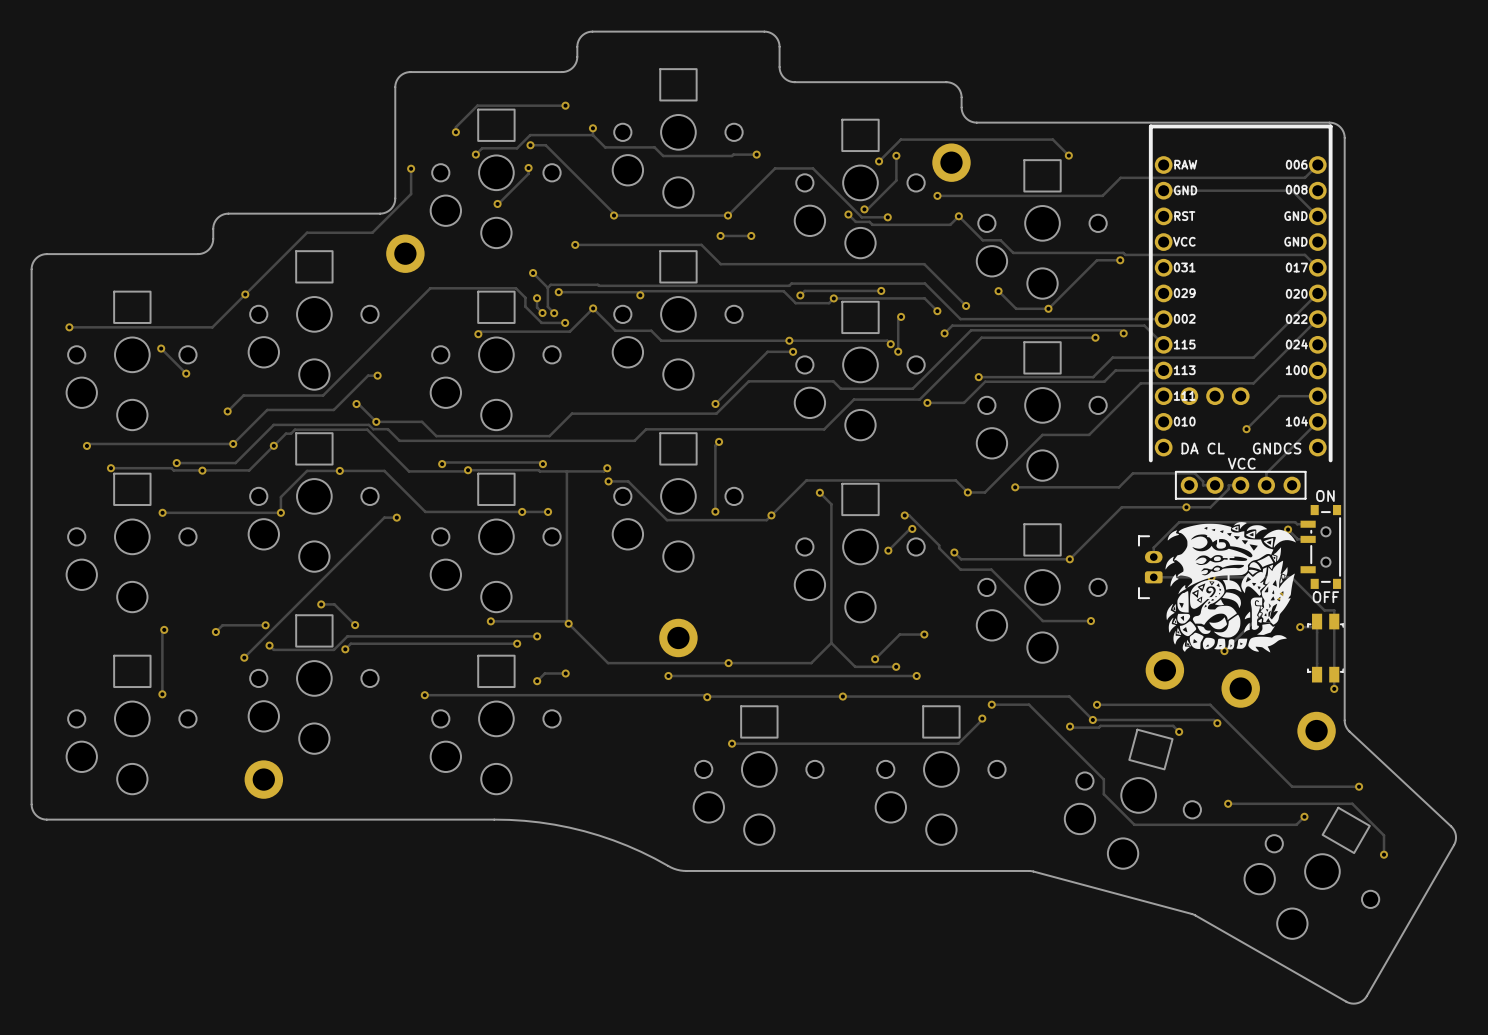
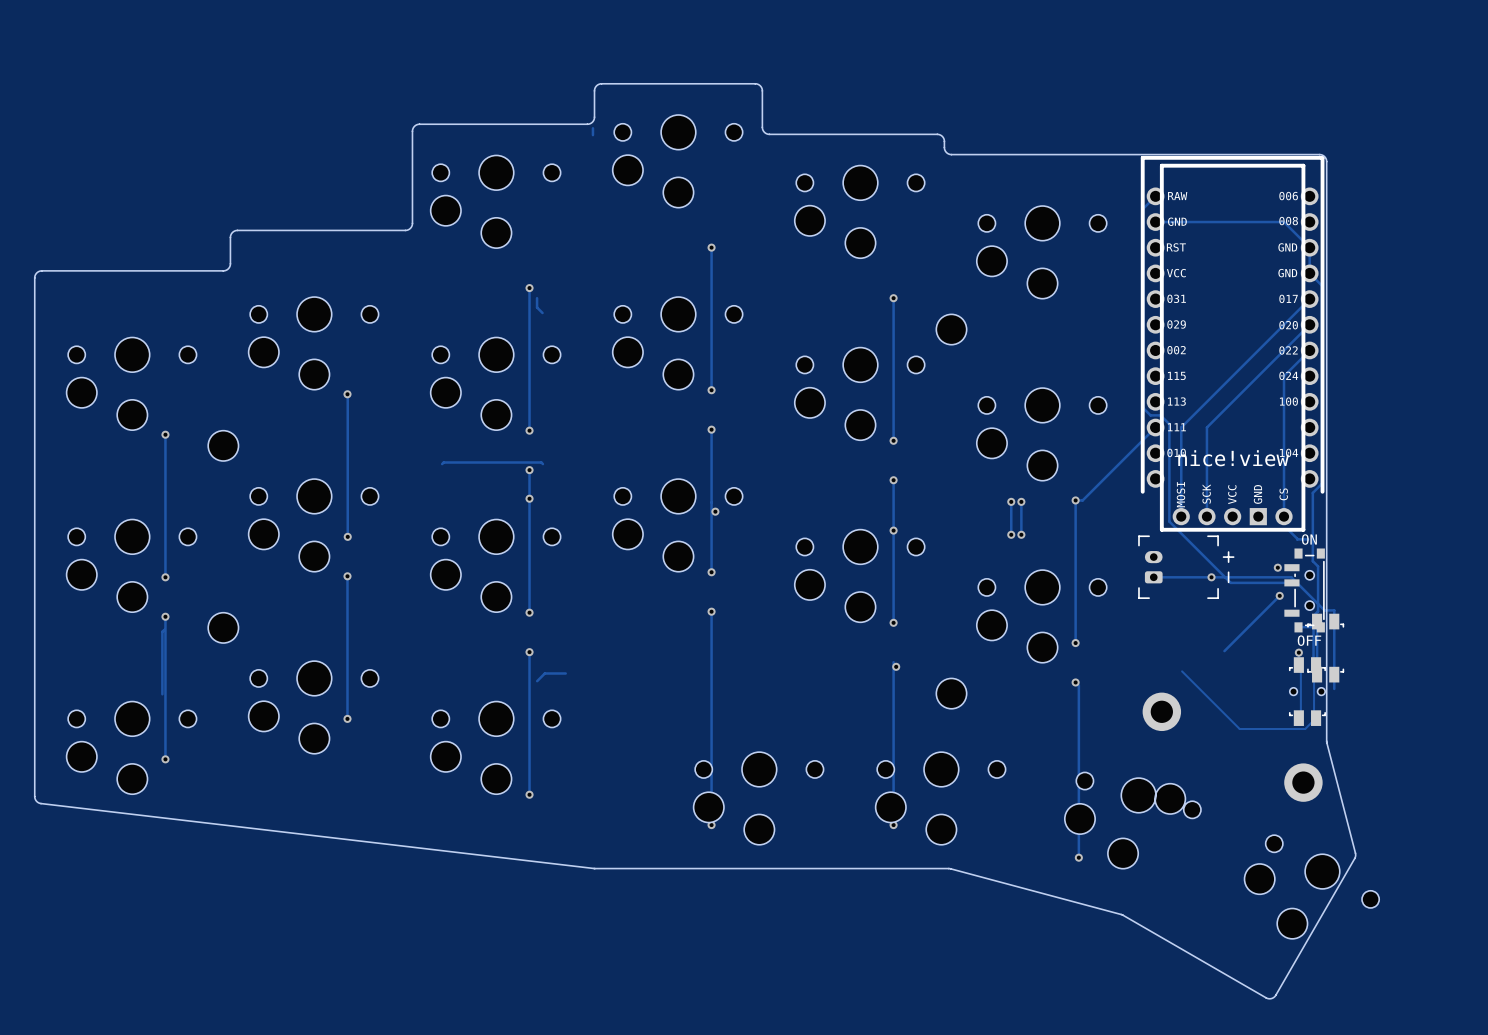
board edge: (592, 31) (768, 32) (775, 36) (778, 40) (780, 70) (782, 76) (788, 81) (950, 82) (955, 85) (960, 91) (963, 115) (967, 119) (974, 122) (1329, 122) (1337, 124) (1341, 128) (1344, 137) (1345, 723) (1349, 731) (1451, 826) (1456, 837) (1454, 845) (1362, 1000) (1353, 1003) (1346, 1001) (1193, 914) (1031, 871) (683, 870) (673, 868) (641, 851) (598, 835) (554, 824) (509, 819) (46, 819) (40, 818) (34, 813) (31, 804) (31, 269) (34, 260) (40, 255) (46, 254) (202, 253) (207, 250) (212, 244) (215, 221) (220, 215) (226, 213) (385, 212) (392, 207) (395, 200) (395, 87) (397, 79) (401, 75) (410, 72) (566, 71) (571, 68) (576, 62) (579, 39) (584, 33) (592, 31) -> (601, 83) (594, 88) (594, 117) (589, 124) (419, 124) (415, 125) (412, 131) (412, 224) (407, 230) (236, 230) (230, 235) (230, 264) (224, 270) (41, 270) (36, 273) (34, 277) (36, 800) (41, 803) (594, 868) (949, 868) (1122, 914) (1266, 997) (1273, 997) (1355, 855) (1326, 741) (1326, 161) (1325, 157) (1319, 154) (950, 154) (945, 151) (943, 138) (938, 134) (767, 133) (762, 128) (762, 89) (756, 83) (601, 83)
part: (678, 84) -> none
track: (565, 105) (477, 105) (455, 127) (455, 132) -> none
via: (565, 105) -> none
part: (496, 125) -> none
via: (592, 128) -> none
via: (455, 132) -> none
part: (860, 135) -> none
track: (530, 145) (545, 145) (613, 215) (728, 215) (775, 168) (812, 168) (861, 217) (887, 217) -> none
via: (530, 145) -> none
track: (475, 154) (482, 148) (517, 148) (530, 135) (592, 135) (605, 147) (654, 147) (663, 156) (756, 154) -> none
via: (475, 154) -> none
via: (756, 154) -> none
track: (896, 155) (896, 180) (867, 209) (864, 209) -> none
via: (896, 155) -> none
track: (1068, 155) (1052, 139) (900, 139) (879, 161) -> none
via: (1068, 155) -> none
via: (879, 161) -> none
part: (951, 162) -> none
track: (1317, 165) (1304, 177) (1120, 177) (1102, 195) (937, 195) -> none
track: (411, 168) (411, 194) (372, 232) (307, 232) (212, 327) (69, 327) -> none
via: (411, 168) -> none
track: (528, 168) (528, 173) (497, 203) -> none
via: (528, 168) -> none
part: (1042, 175) -> none
track: (1163, 190) (1292, 190) (1317, 216) -> none
via: (937, 195) -> none
track: none -> (1155, 196) (1143, 208) (1143, 408) (1150, 415) (1160, 415) (1169, 424) (1169, 521) (1230, 582) (1291, 582)
via: (497, 203) -> none
via: (864, 209) -> none
track: (848, 214) (855, 221) (869, 221) (872, 224) (950, 224) (958, 216) (982, 240) (1000, 240) (1013, 252) (1304, 254) (1317, 267) -> none
via: (848, 214) -> none
via: (613, 215) -> none
via: (728, 215) -> none
via: (958, 216) -> none
via: (887, 217) -> none
track: none -> (1155, 222) (1284, 222) (1309, 247) (1309, 273) (1321, 285) (1321, 483) (1312, 492) (1312, 561) (1318, 566) (1318, 611) (1313, 615) (1313, 662) (1316, 665) (1314, 667) (1314, 716) (1316, 718) (1305, 729) (1239, 729) (1182, 671)
track: (720, 235) (751, 235) -> none
via position: (720, 235) -> (711, 247)
via: (751, 235) -> none
track: (575, 244) (701, 244) (720, 264) (924, 264) (966, 305) -> none
via: (575, 244) -> none
track: none -> (711, 247) (711, 390)
part: (405, 253) -> none
track: (1120, 260) (1097, 260) (1048, 308) (1016, 308) (998, 291) -> none
via: (1120, 260) -> none
part: (314, 266) -> none
part: (678, 266) -> none
track: (533, 273) (547, 287) -> none
via: (533, 273) -> none
track: none -> (529, 288) (529, 430)
via: none -> (529, 288)
track: (881, 290) (804, 290) (800, 295) -> none
via: (881, 290) -> none
via: (998, 291) -> none
track: (558, 292) (640, 292) -> none
via: (558, 292) -> none
track: (640, 292) (783, 291) (795, 303) (829, 303) (833, 298) (924, 298) (937, 311) -> none
part: (1240, 293) -> none
track: (1317, 293) (1253, 357) (1112, 357) (1093, 377) (978, 377) -> none
via: (245, 294) -> none
via: (640, 295) -> none
via: (800, 295) -> none
via: (537, 298) -> none
via: (833, 298) -> none
track: none -> (893, 298) (893, 440)
via: none -> (893, 298)
track: none -> (1309, 299) (1181, 427) (1181, 516)
via: (966, 305) -> none
part: (132, 307) -> none
part: (496, 307) -> none
via: (593, 308) -> none
via: (1048, 308) -> none
via: (937, 311) -> none
via: (542, 312) -> none
track: (554, 313) (547, 306) (547, 287) (550, 284) (789, 285) (791, 283) (924, 283) (960, 319) (1163, 319) -> none
via: (554, 313) -> none
track: (901, 316) (898, 319) (898, 351) -> none
via: (901, 316) -> none
part: (860, 317) -> none
track: (1317, 319) (1253, 383) (1140, 383) (1089, 434) (1042, 434) (984, 492) (967, 492) (955, 480) (806, 480) (766, 520) (667, 520) (628, 481) (608, 481) -> none
track: (565, 322) (541, 322) (525, 306) (525, 297) (515, 288) (430, 288) (323, 395) (243, 395) (227, 411) -> none
via: (565, 322) -> none
part: none -> (1232, 324)
track: none -> (1309, 324) (1206, 427) (1206, 516)
via: (69, 327) -> none
part: none -> (951, 329)
track: (944, 333) (952, 325) (1144, 325) (1163, 344) -> none
via: (944, 333) -> none
track: (1123, 333) (1120, 330) (971, 330) (912, 388) (840, 388) (833, 381) (748, 381) (716, 413) (572, 413) (549, 436) (436, 436) (422, 421) (376, 421) (356, 404) -> none
via: (1123, 333) -> none
track: (478, 334) (480, 331) (569, 331) (593, 308) (615, 330) (651, 330) (661, 340) (887, 340) (890, 344) -> none
via: (478, 334) -> none
track: (1095, 337) (981, 337) (919, 399) (854, 399) (824, 429) (646, 429) (634, 440) (399, 440) (387, 429) (373, 429) (368, 424) (273, 424) (235, 463) (176, 463) -> none
via: (1095, 337) -> none
via: (789, 340) -> none
via: (890, 344) -> none
part: none -> (1232, 347)
track: (161, 348) (186, 373) -> none
via: (161, 348) -> none
track: none -> (1309, 350) (1284, 376) (1284, 516)
track: (793, 351) (767, 351) (715, 403) -> none
via: (793, 351) -> none
via: (898, 351) -> none
part: (1042, 357) -> none
track: (1163, 370) (1115, 370) (1104, 381) (985, 381) (964, 402) (927, 402) -> none
via: (186, 373) -> none
track: (377, 375) (368, 375) (333, 409) (267, 409) (233, 443) (88, 443) (86, 445) -> none
via: (377, 375) -> none
via: (978, 377) -> none
via: none -> (711, 390)
track: none -> (347, 394) (347, 536)
track: (1317, 396) (1279, 396) (1246, 429) -> none
via: (927, 402) -> none
via: (715, 403) -> none
via position: (356, 404) -> (347, 394)
via: (227, 411) -> none
via: (376, 421) -> none
track: (1317, 421) (1266, 473) (1266, 485) -> none
track: none -> (1155, 427) (1082, 500) (1075, 500) (1075, 643)
track: none -> (711, 429) (711, 572)
via: none -> (711, 429)
via: (1246, 429) -> none
via: none -> (529, 430)
track: none -> (165, 434) (165, 577)
via: none -> (165, 434)
via: none -> (893, 440)
track: (719, 441) (715, 445) (715, 511) -> none
via: (719, 441) -> none
via: (233, 443) -> none
via: (86, 445) -> none
part: none -> (223, 445)
via: (273, 445) -> none
part: (314, 448) -> none
part: (678, 448) -> none
via: (176, 463) -> none
via: (442, 464) -> none
via position: (542, 464) -> (529, 470)
track: (110, 468) (249, 470) (285, 433) (291, 433) (294, 429) (367, 429) (409, 471) (604, 471) (607, 468) -> none
via: (110, 468) -> none
via: (607, 468) -> none
via: (202, 470) -> none
via: (339, 470) -> none
via: (468, 470) -> none
track: none -> (529, 470) (529, 612)
track: (566, 471) (566, 621) -> none
track: none -> (893, 480) (893, 622)
via: none -> (893, 480)
via: (608, 481) -> none
track: (1215, 485) (1203, 485) (1203, 481) (1194, 473) (1132, 473) (1119, 487) (1015, 487) -> none
track: (1240, 485) (1228, 485) (1228, 489) (1210, 507) (1121, 507) (1069, 559) (961, 559) (954, 552) -> none
part: (1240, 485) -> none
via: (1015, 487) -> none
part: (132, 489) -> none
part: (496, 489) -> none
track: (819, 492) (831, 504) (831, 643) -> none
via: (819, 492) -> none
via: (967, 492) -> none
via: none -> (529, 498)
part: (860, 499) -> none
via: none -> (1075, 500)
track: none -> (1011, 501) (1011, 534)
via: none -> (1011, 501)
track: none -> (1021, 501) (1021, 534)
via: none -> (1021, 501)
via: (1186, 507) -> none
via: (522, 511) -> none
track: (548, 511) (425, 511) (384, 470) (307, 470) (280, 497) (280, 512) (162, 512) -> none
via: (548, 511) -> none
via: (162, 512) -> none
via: (280, 512) -> none
via: (771, 515) -> none
track: (904, 515) (909, 515) (960, 569) (991, 569) (1042, 621) (1090, 621) -> none
via: (904, 515) -> none
track: (396, 517) (384, 517) (244, 657) -> none
via: (396, 517) -> none
drawing: [1165, 522, 1296, 653] -> none
track: (1308, 524) (1297, 524) (1295, 522) (1179, 522) (1153, 547) (1153, 557) -> none
track: (912, 528) (910, 528) (888, 550) -> none
via: (912, 528) -> none
via: (1288, 529) -> none
via: none -> (893, 530)
via: none -> (1011, 534)
via: none -> (1021, 534)
via: none -> (347, 536)
part: (1042, 539) -> none
part position: (1320, 546) -> (1304, 590)
via: (888, 550) -> none
via: (954, 552) -> none
via: (1069, 559) -> none
via: none -> (1277, 567)
via: none -> (711, 572)
track: none -> (347, 576) (347, 718)
via: none -> (347, 576)
via: none -> (165, 577)
track: (321, 604) (334, 604) (355, 625) -> none
via: (321, 604) -> none
track: none -> (711, 611) (711, 825)
via: none -> (711, 611)
via: none -> (529, 612)
track: none -> (165, 616) (165, 759)
track: (490, 621) (566, 621) -> none
via: (490, 621) -> none
track: (566, 621) (608, 663) (811, 663) (831, 643) -> none
via position: (1090, 621) -> (1075, 643)
via: none -> (893, 622)
via: (568, 623) -> none
track: (265, 625) (222, 625) (215, 631) -> none
via: (265, 625) -> none
via: (355, 625) -> none
part: none -> (223, 627)
via: (1300, 627) -> none
via position: (164, 629) -> (165, 616)
part: (314, 630) -> none
via: (215, 631) -> none
track: (924, 634) (899, 634) (875, 659) -> none
via: (924, 634) -> none
track: (537, 636) (347, 636) (333, 649) (273, 649) (269, 645) -> none
via: (537, 636) -> none
part: (678, 637) -> none
track: (517, 643) (350, 643) (345, 649) -> none
via: (517, 643) -> none
track: (831, 643) (855, 666) (896, 666) -> none
via: (269, 645) -> none
via: (345, 649) -> none
via: (1224, 651) -> none
track: none -> (529, 652) (529, 794)
via: none -> (529, 652)
track: none -> (1298, 652) (1298, 665) (1300, 667) (1300, 716) (1298, 718)
via: none -> (1298, 652)
via: (244, 657) -> none
via: (875, 659) -> none
track: none -> (893, 662) (893, 825)
via: (728, 663) -> none
part: (1164, 670) -> none
part: (132, 671) -> none
part: (496, 671) -> none
via: (565, 673) -> none
track: (668, 675) (916, 675) -> none
via: (668, 675) -> none
via: (916, 675) -> none
via: (537, 681) -> none
track: none -> (1075, 682) (1078, 685) (1078, 857)
via: none -> (1075, 682)
part: (1240, 688) -> none
via: (1334, 688) -> none
part: none -> (1307, 691)
part: none -> (951, 693)
via: (162, 694) -> none
track: (424, 695) (1069, 696) (1092, 719) (1214, 719) (1217, 723) -> none
via: (424, 695) -> none
via: (842, 696) -> none
via: (707, 697) -> none
track: (991, 704) (1029, 704) (1103, 779) (1103, 794) (1134, 824) (1296, 824) (1304, 816) -> none
via: (991, 704) -> none
track: (1097, 704) (1210, 704) (1292, 786) (1359, 786) -> none
via: (1097, 704) -> none
part: none -> (1161, 711)
via: none -> (347, 718)
track: (982, 718) (958, 743) (732, 743) -> none
via: (982, 718) -> none
via: (1092, 719) -> none
part: (759, 721) -> none
part: (941, 721) -> none
via: (1217, 723) -> none
track: (1070, 726) (1173, 725) (1179, 731) -> none
via: (1070, 726) -> none
via: (1179, 731) -> none
part position: (1316, 731) -> (1303, 782)
via: (732, 743) -> none
part: (1150, 749) -> none
via: none -> (165, 759)
part: (263, 779) -> none
via: (1359, 786) -> none
via: none -> (529, 794)
part: none -> (1170, 798)
track: (1228, 803) (1352, 803) (1384, 835) (1384, 854) -> none
via: (1228, 803) -> none
via: (1304, 816) -> none
via: none -> (711, 825)
via: none -> (893, 825)
part: (1346, 830) -> none
via: (1384, 854) -> none
via: none -> (1078, 857)

